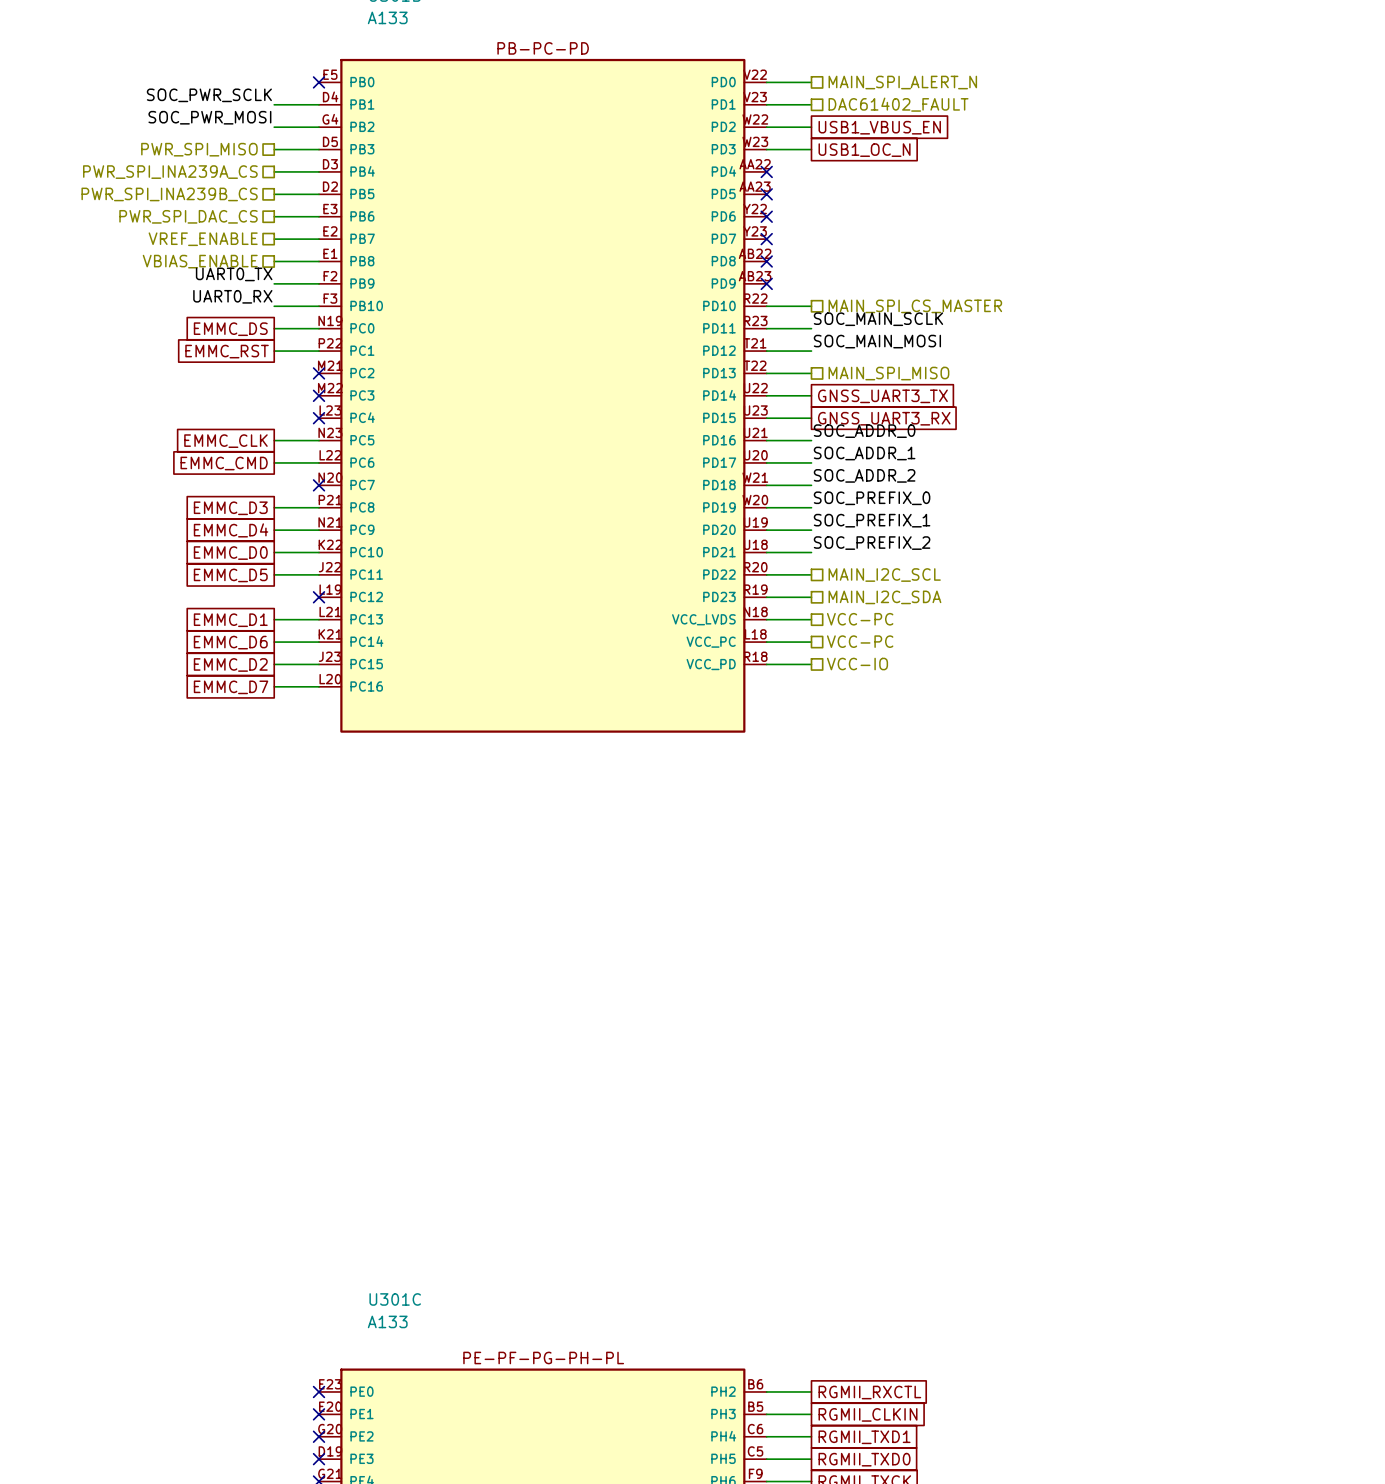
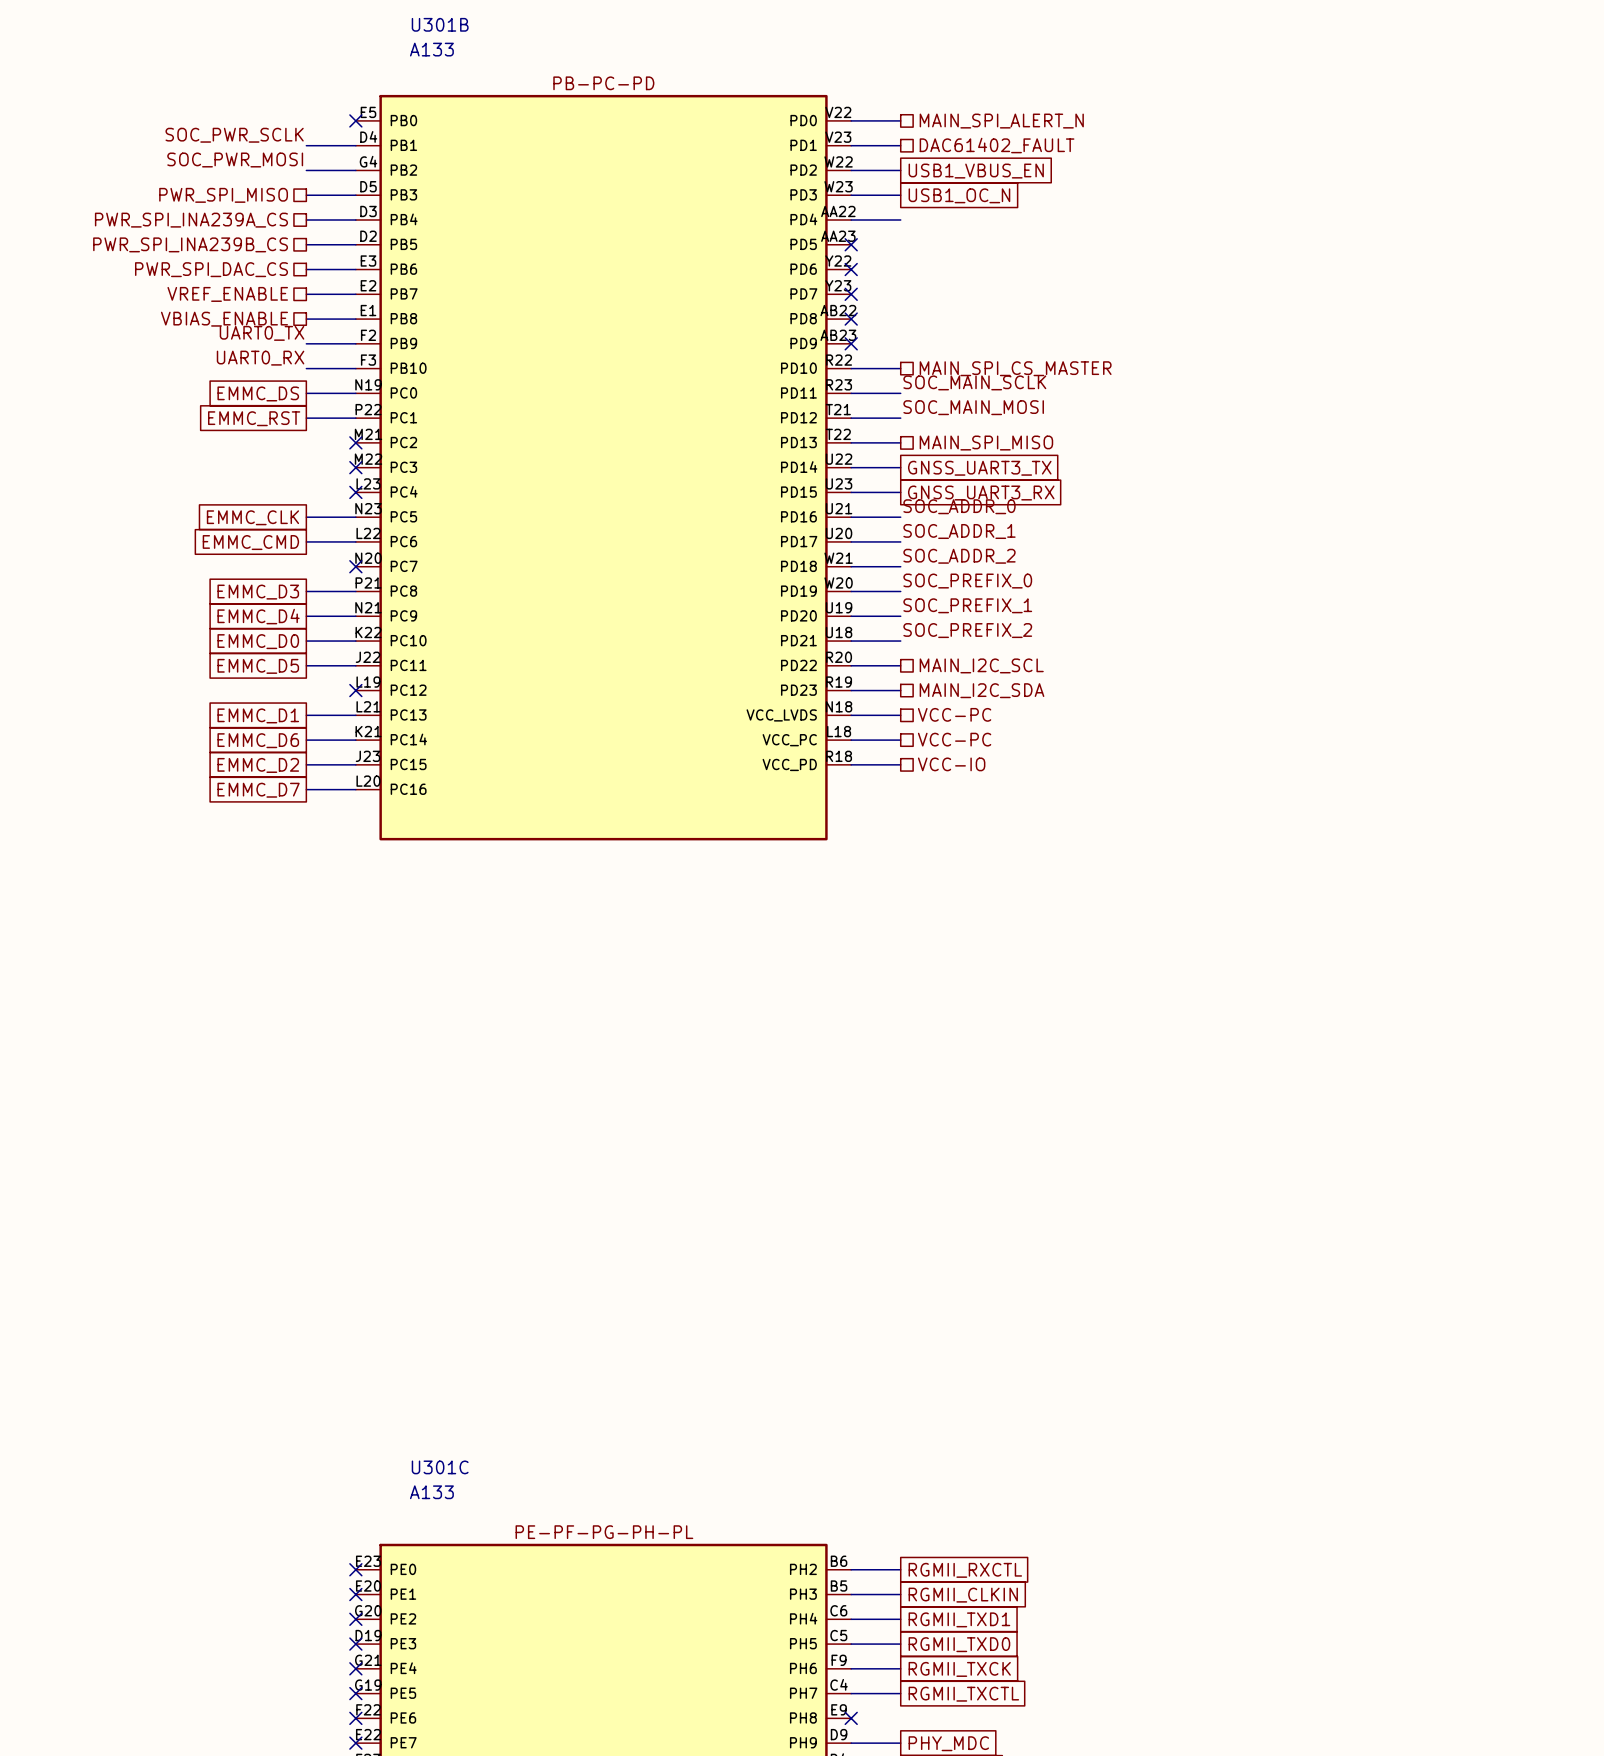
wire: none -> (851, 220) (900, 220)
no-connect mark: (766, 171) -> none

